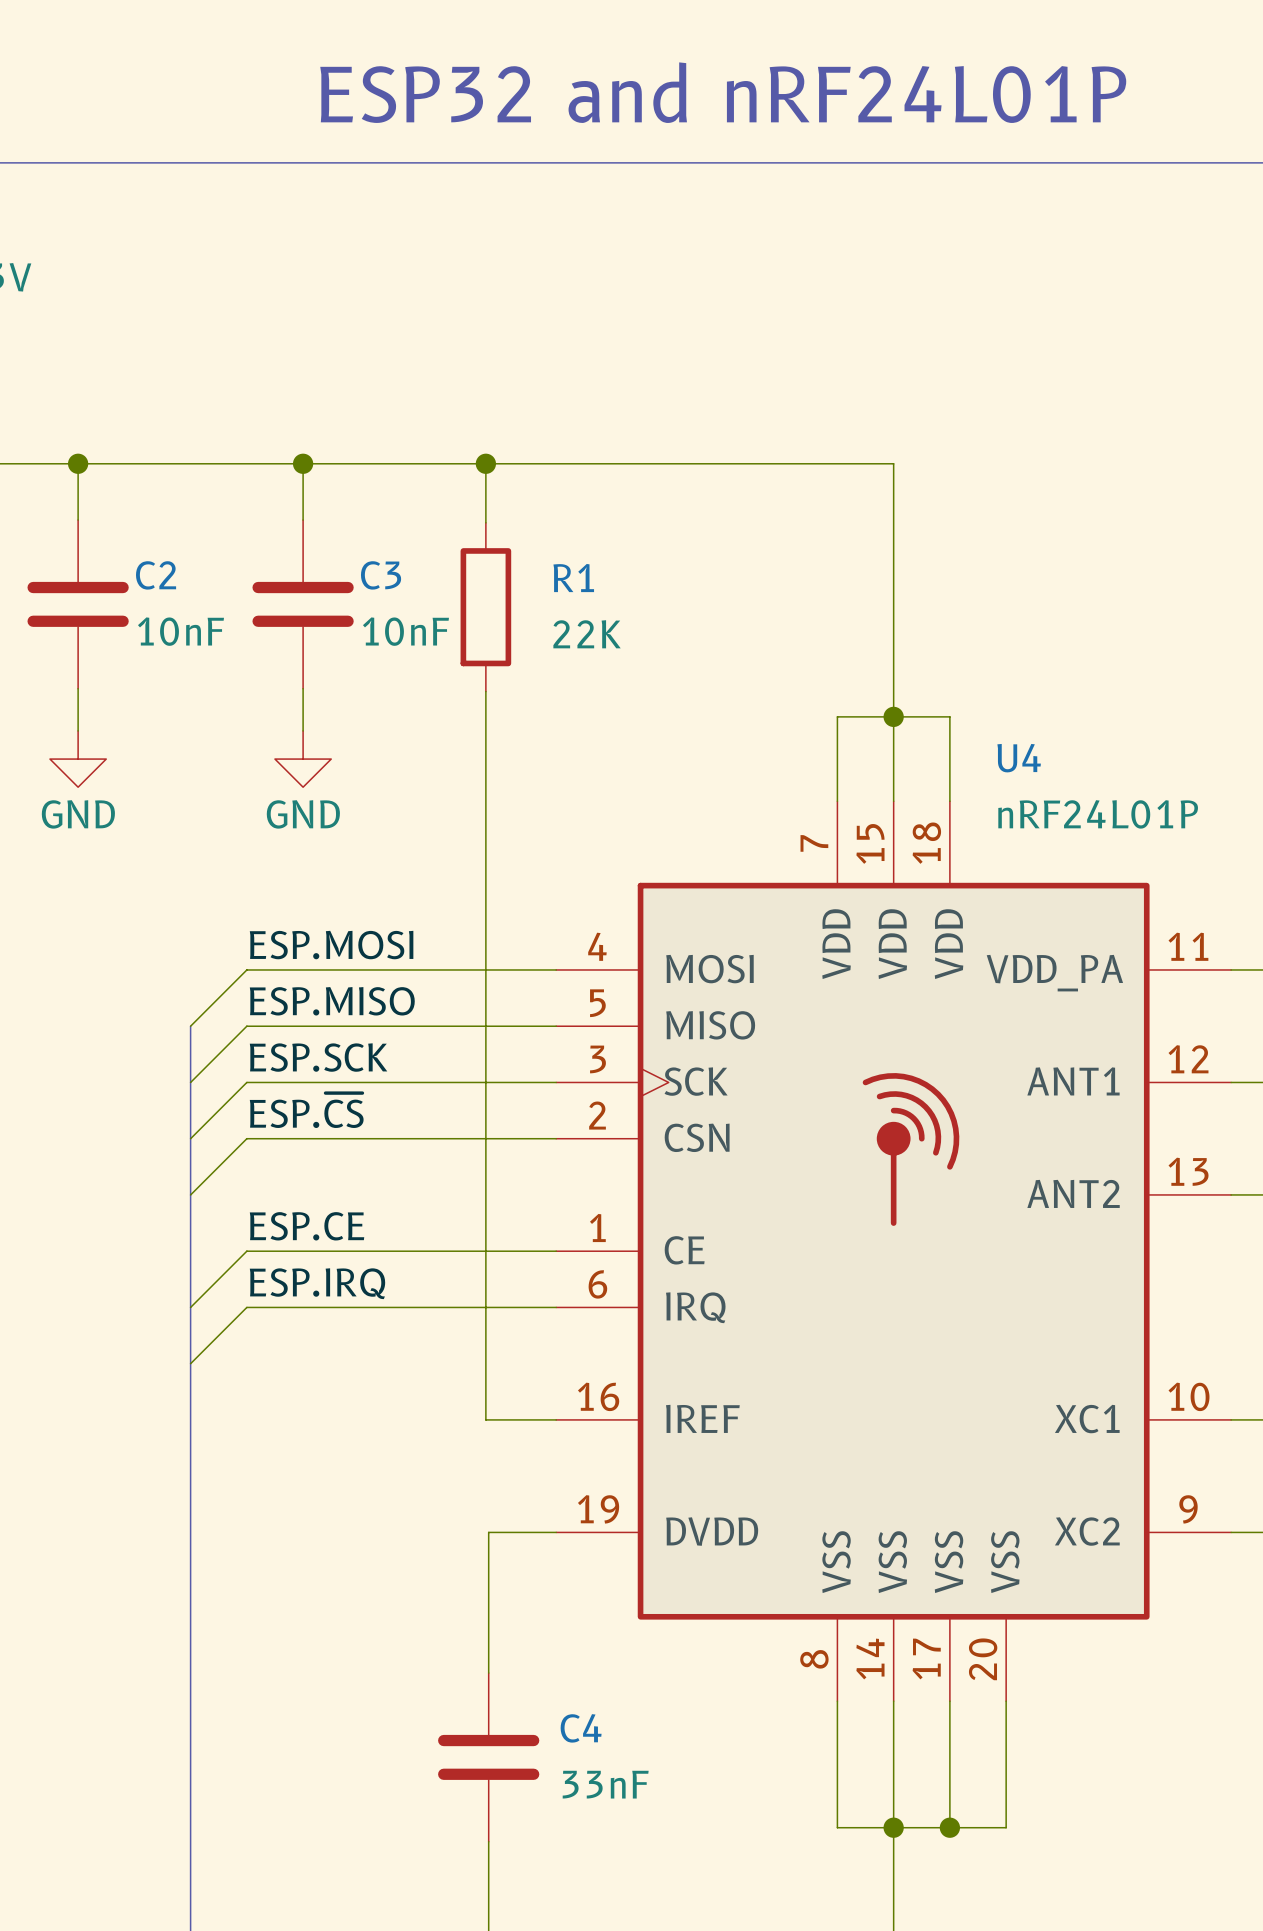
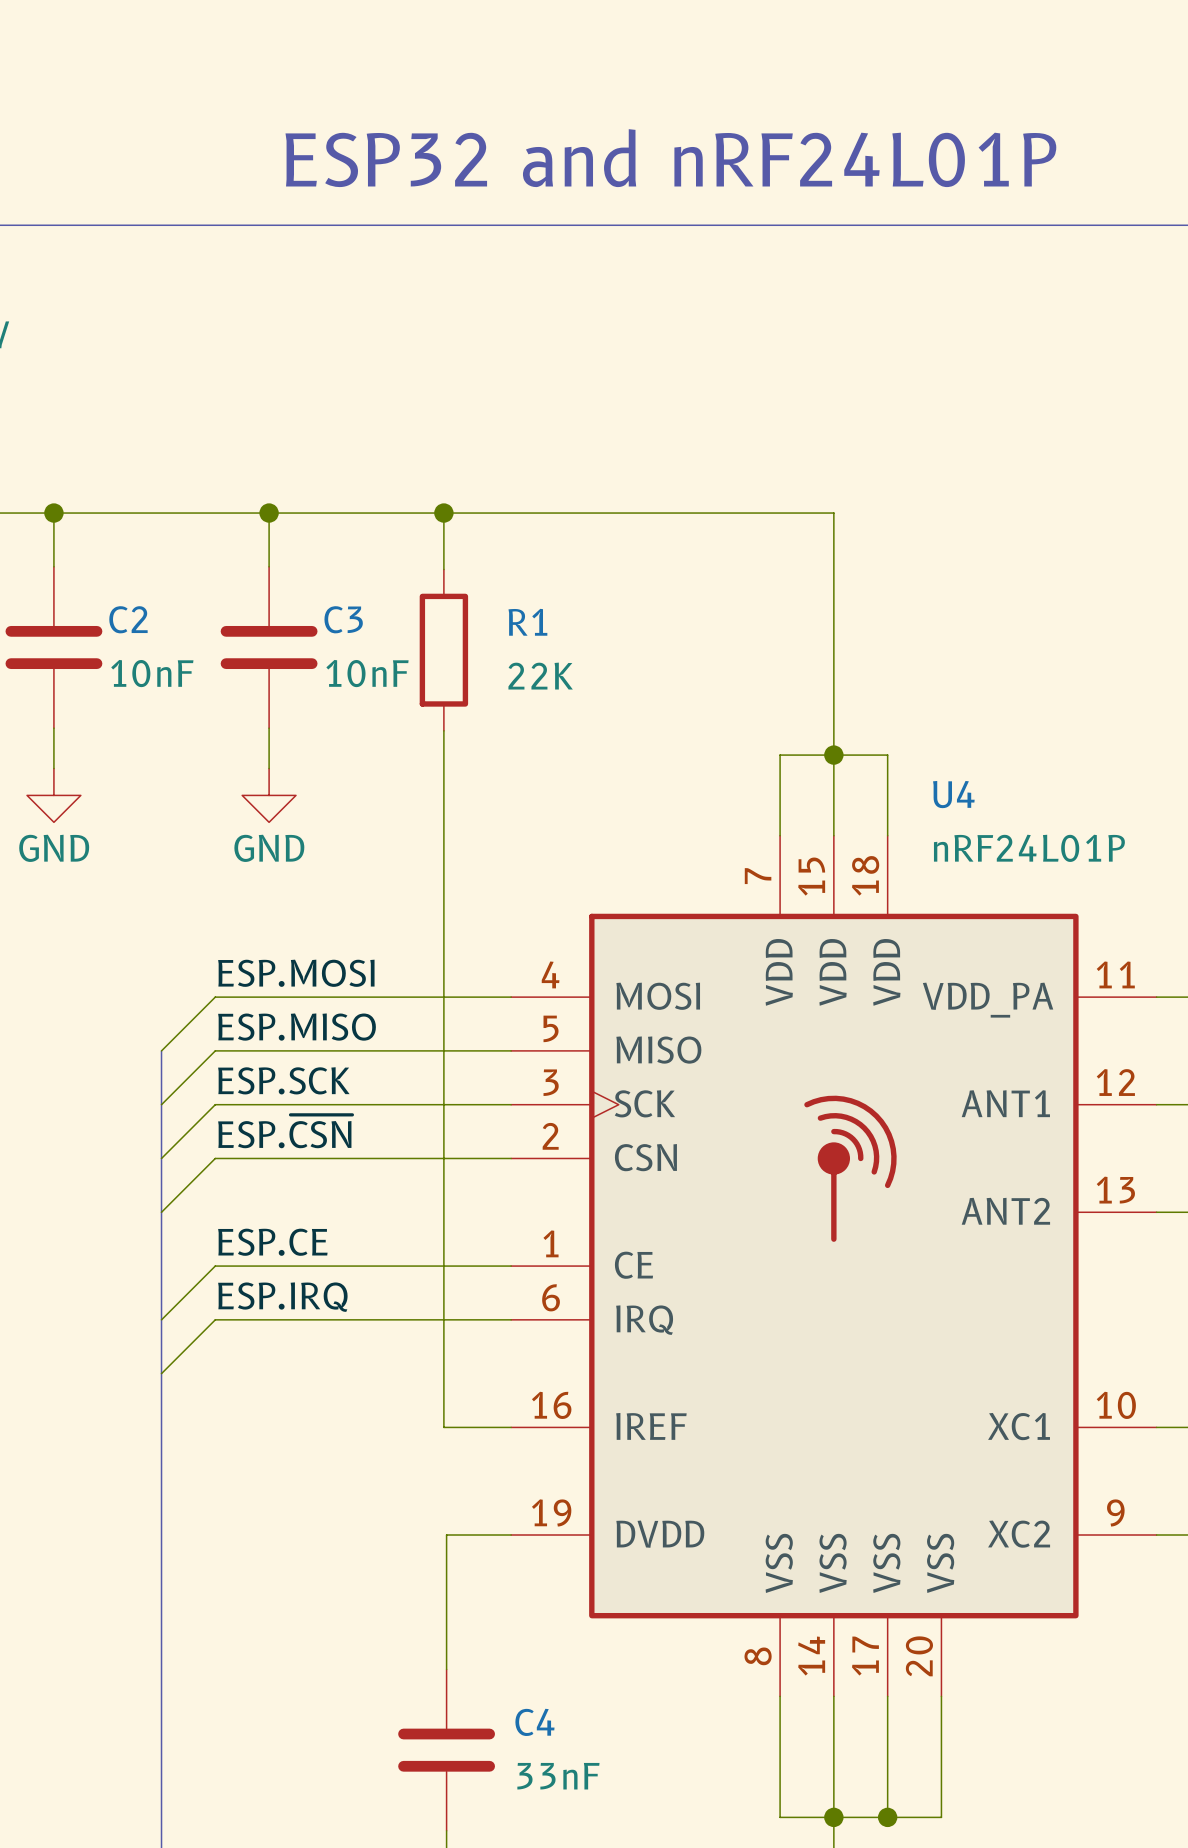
label: ESP.~{CS} (306, 1110) -> ESP.~{CSN} (285, 1131)

